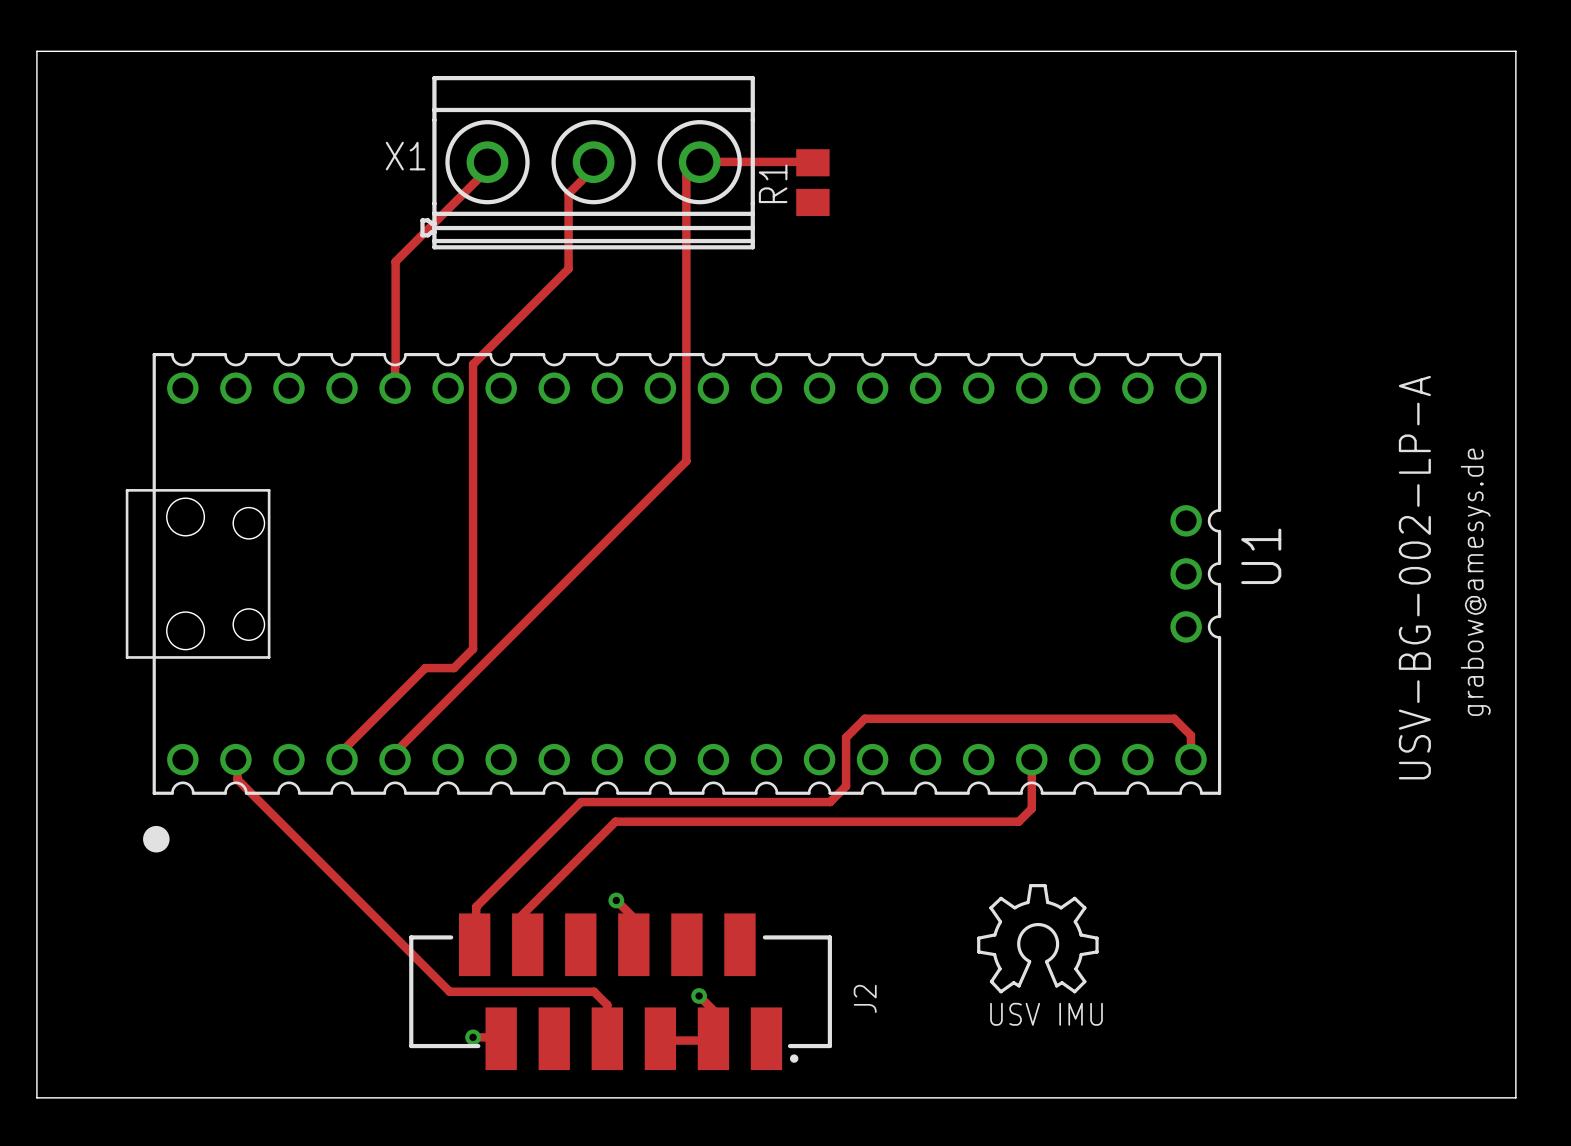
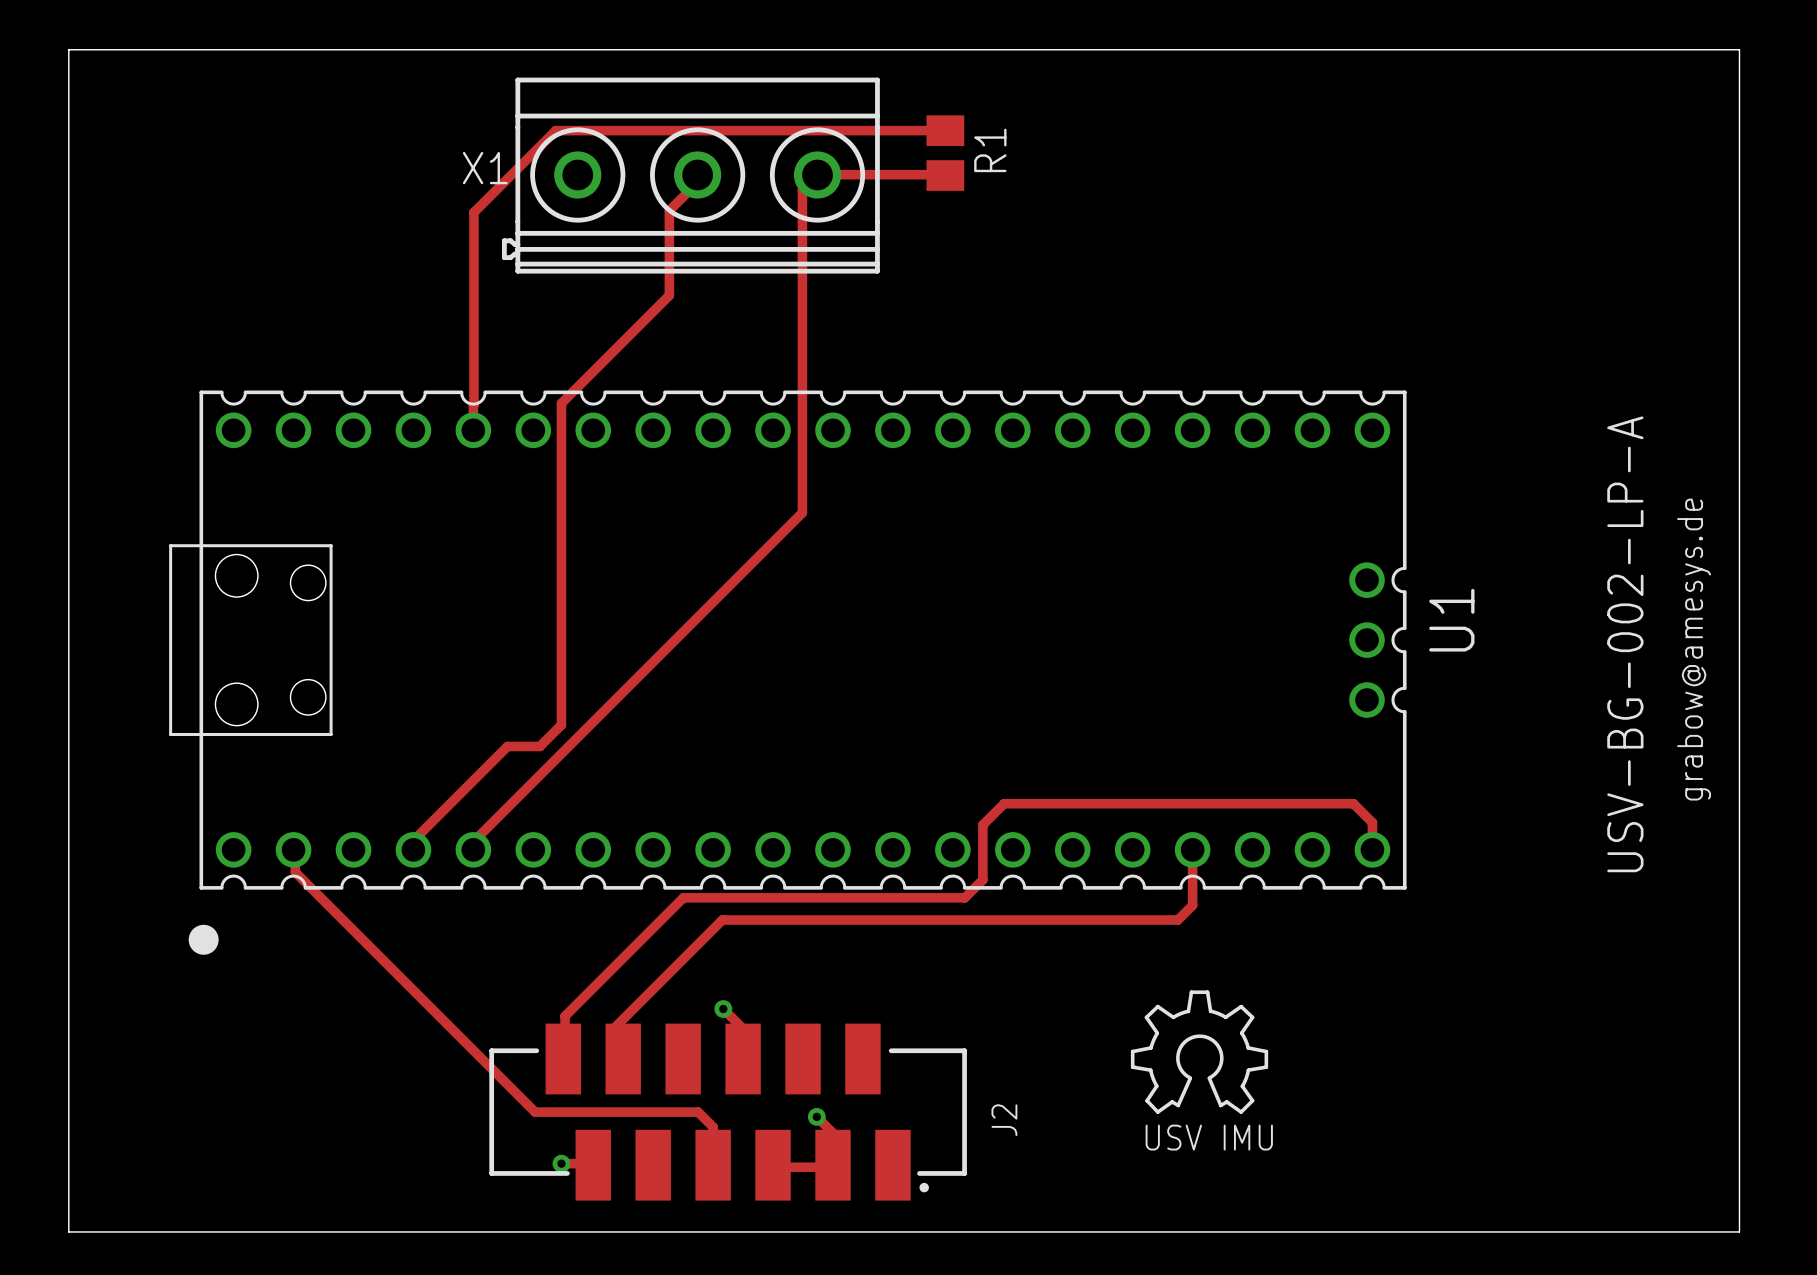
track: (487, 162) (485, 171) (395, 261) -> (945, 130) (555, 130) (473, 212) (473, 287)
R1 position: (812, 182) -> (945, 153)
R1 name position: R1 (773, 183) -> R1 (990, 150)

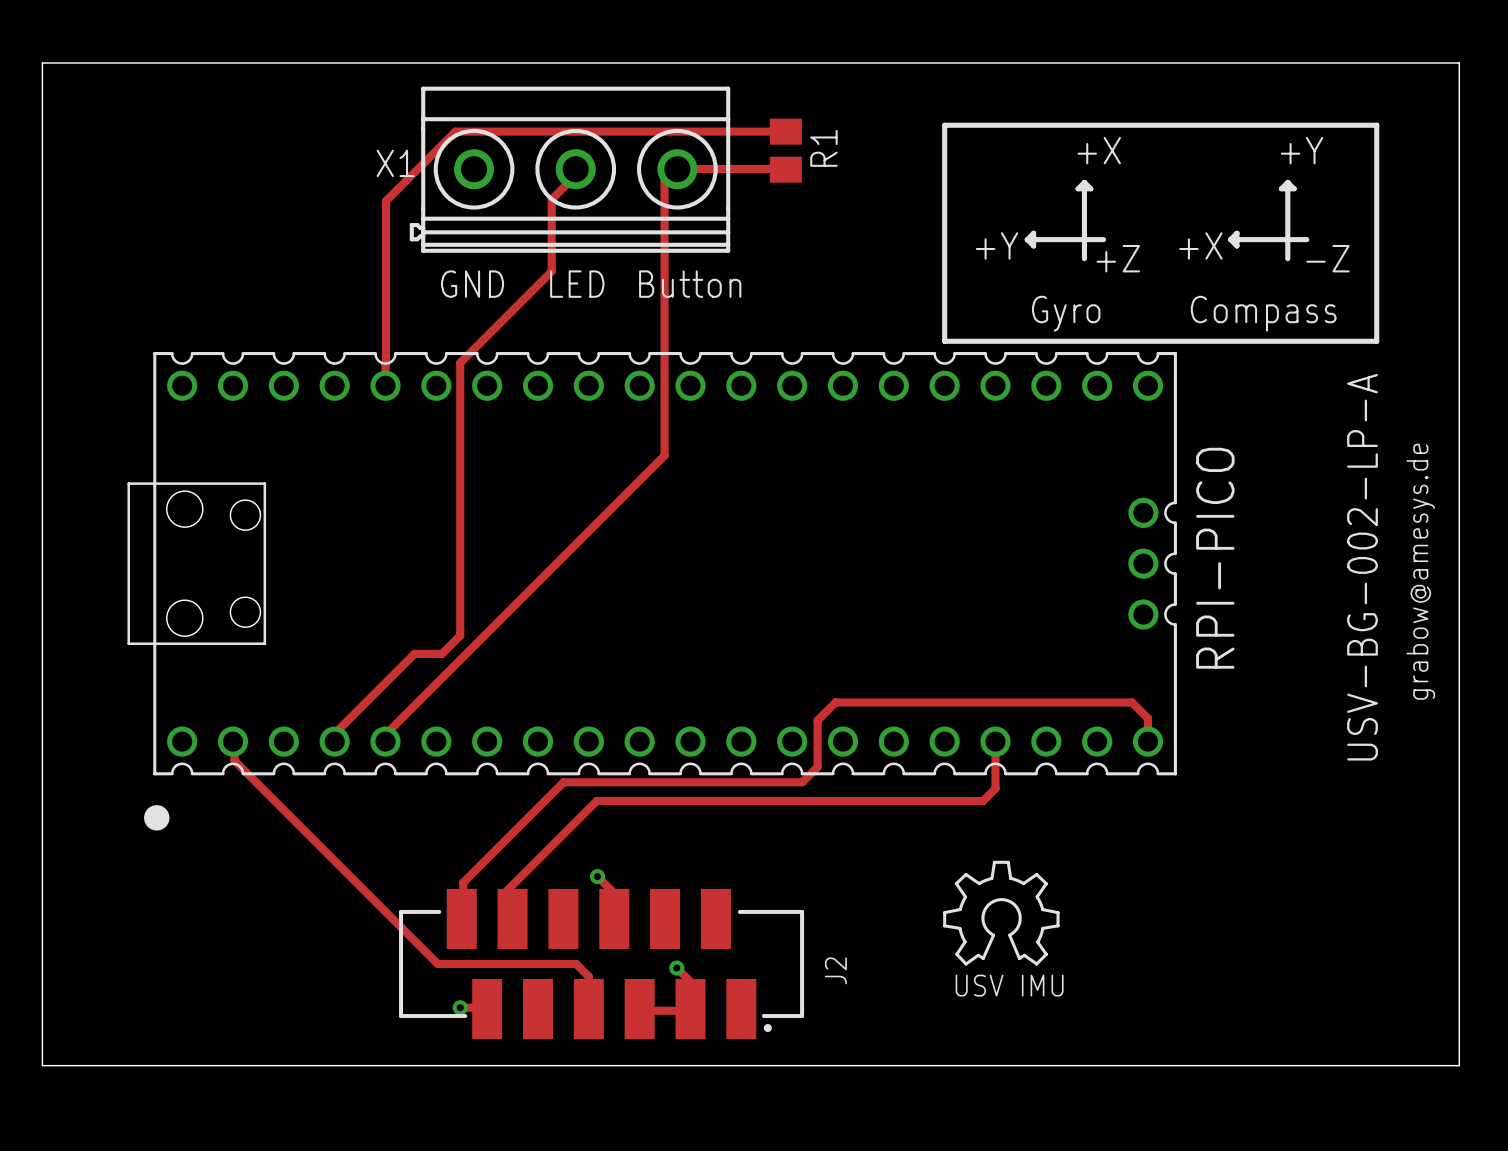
line: none -> (944, 125) (1376, 125) (1376, 341) (944, 341) (944, 125)
text: none -> +X (1099, 150)
text: none -> +Y (1302, 150)
line: none -> (1084, 182) (1084, 258)
line: none -> (1084, 182) (1090, 188) (1078, 188) (1084, 182)
line: none -> (1287, 182) (1287, 258)
line: none -> (1287, 182) (1281, 188) (1294, 188) (1287, 182)
line: none -> (1027, 239) (1103, 239)
line: none -> (1027, 239) (1033, 233) (1033, 245) (1027, 239)
line: none -> (1230, 239) (1306, 239)
line: none -> (1230, 239) (1236, 233) (1236, 245) (1230, 239)
text: none -> +Y (997, 245)
text: none -> +X (1200, 245)
text: none -> +Z (1118, 258)
text: none -> -Z (1327, 258)
text: none -> GND (472, 284)
text: none -> LED (577, 284)
text: none -> Button (690, 284)
text: none -> Gyro (1066, 313)
text: none -> Compass (1263, 313)
U1 name: U1 (1451, 620) -> RPI-PICO (1215, 558)

